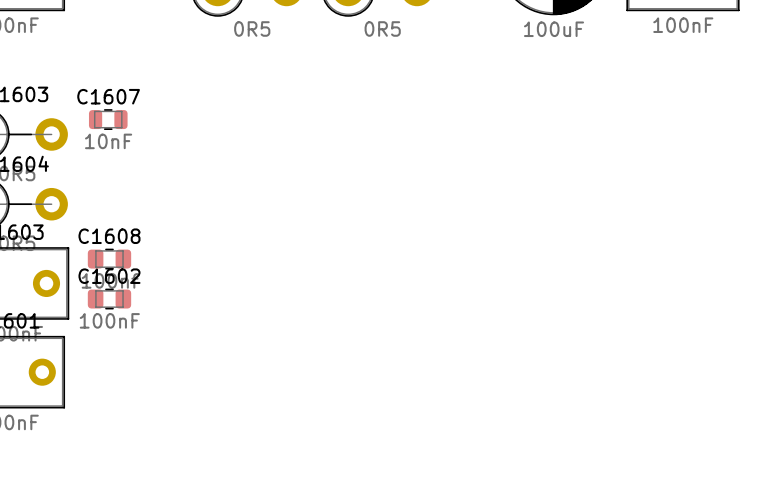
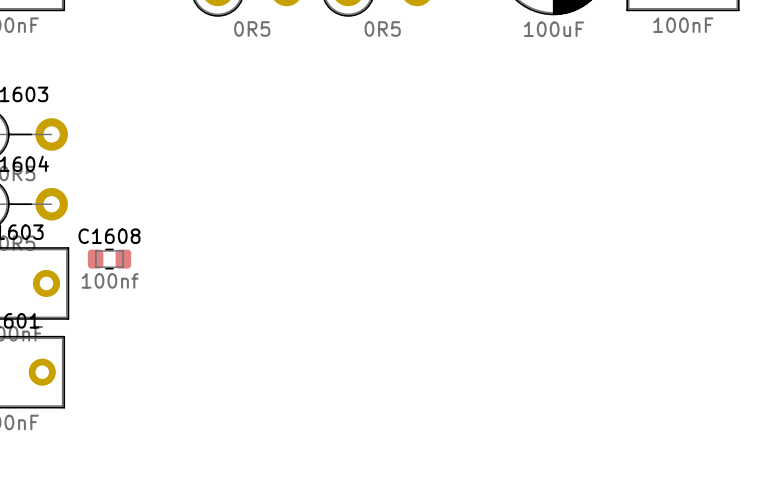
C1607: 10nF (108, 119) -> none
C1602: 100nF (109, 299) -> none

